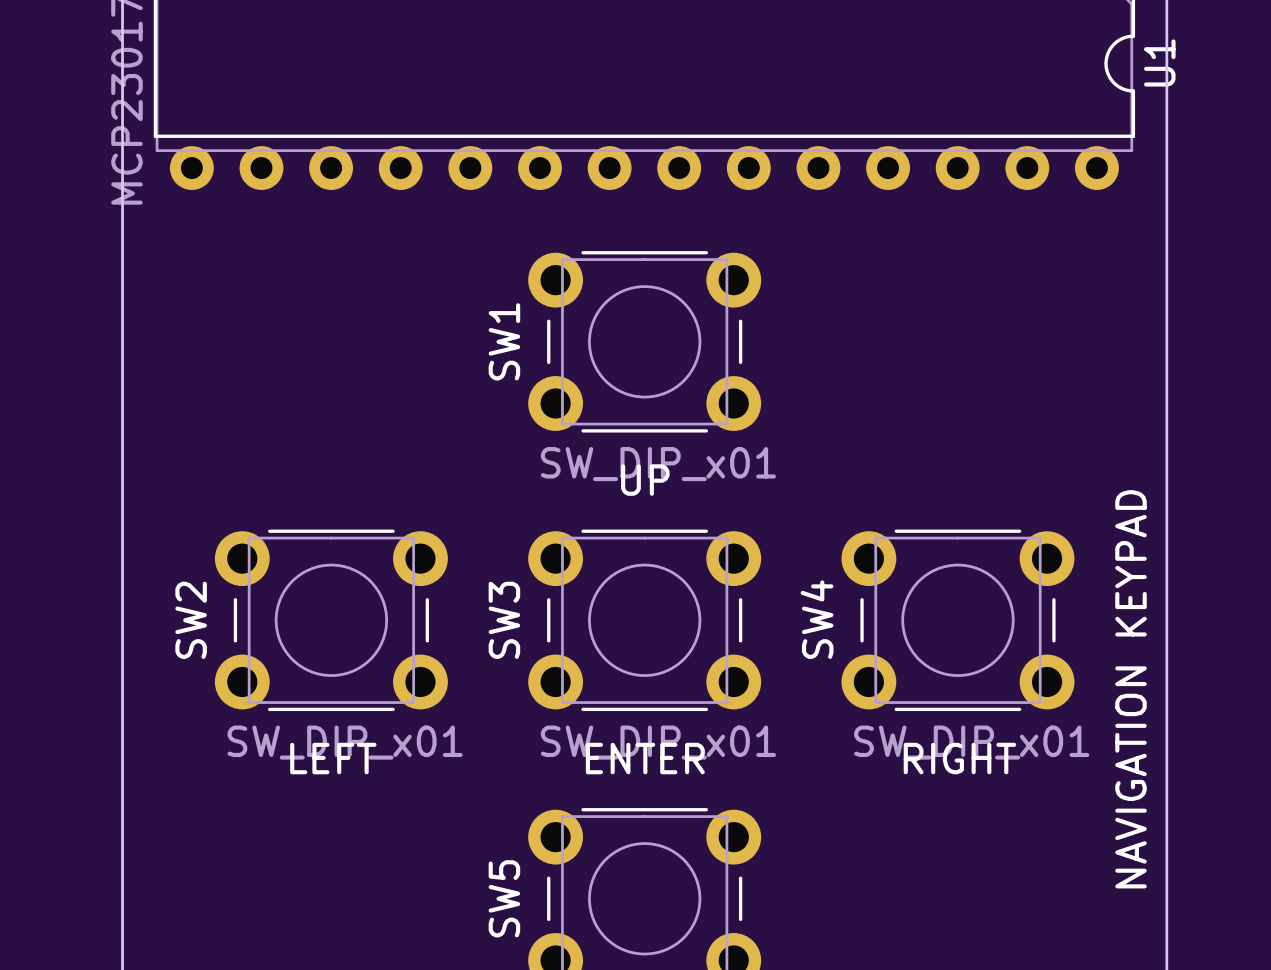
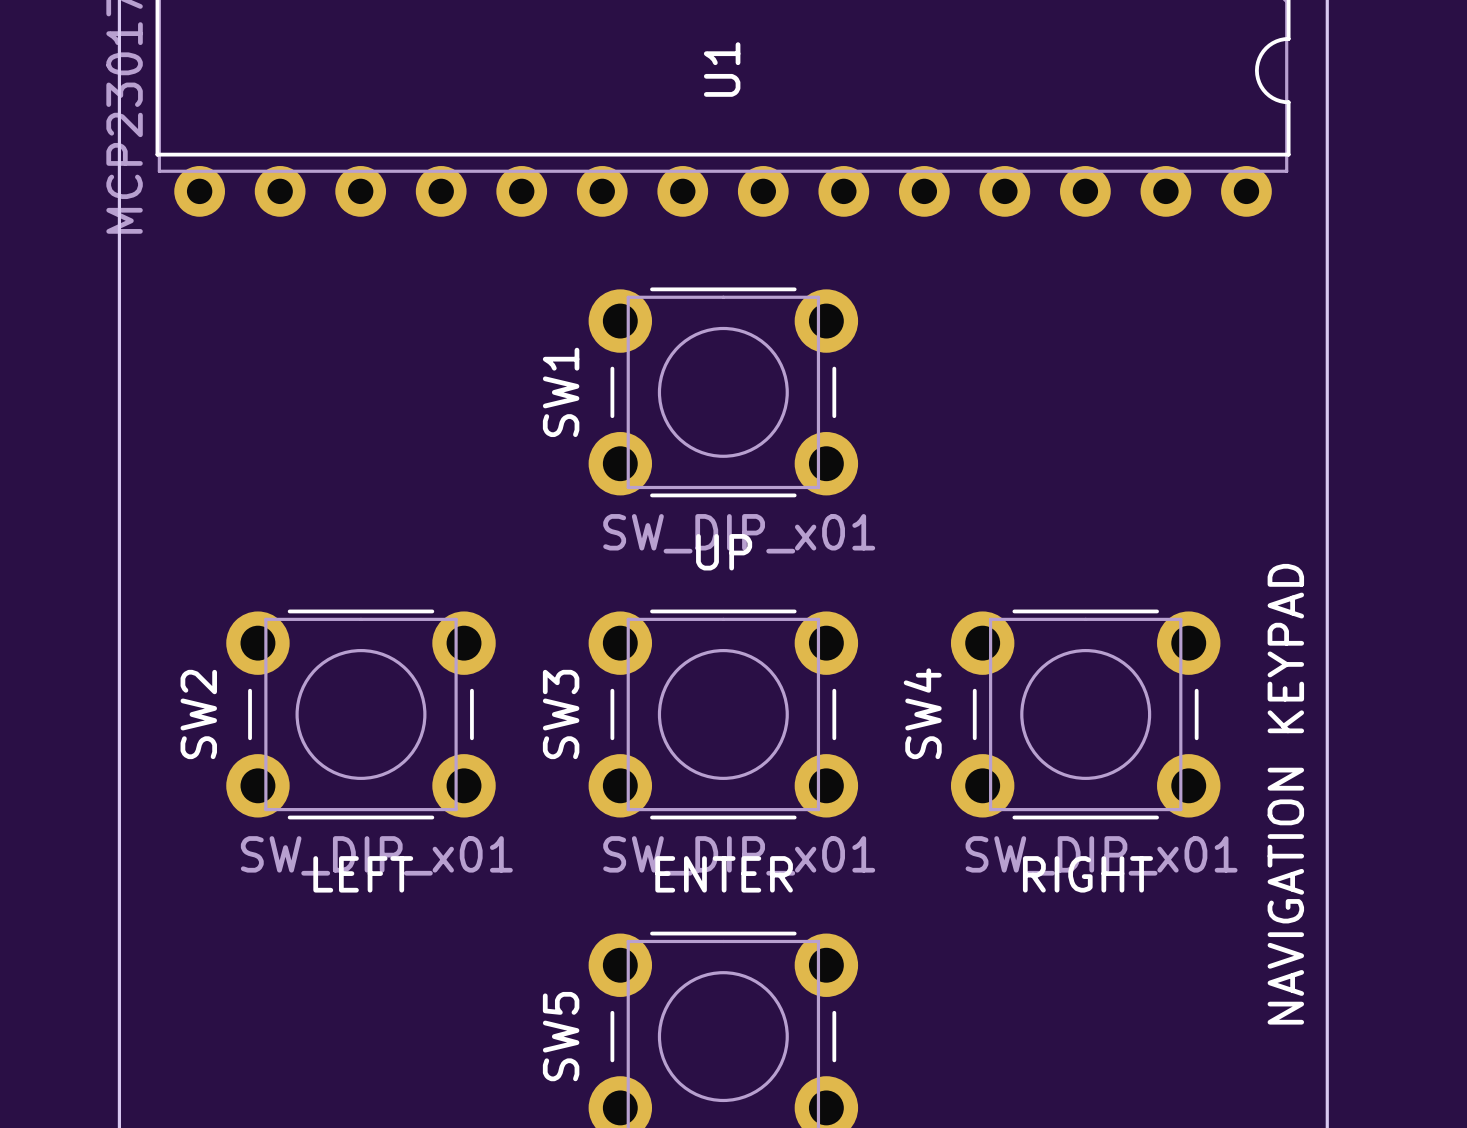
U1 name position: U1 (1159, 62) -> U1 (722, 69)

